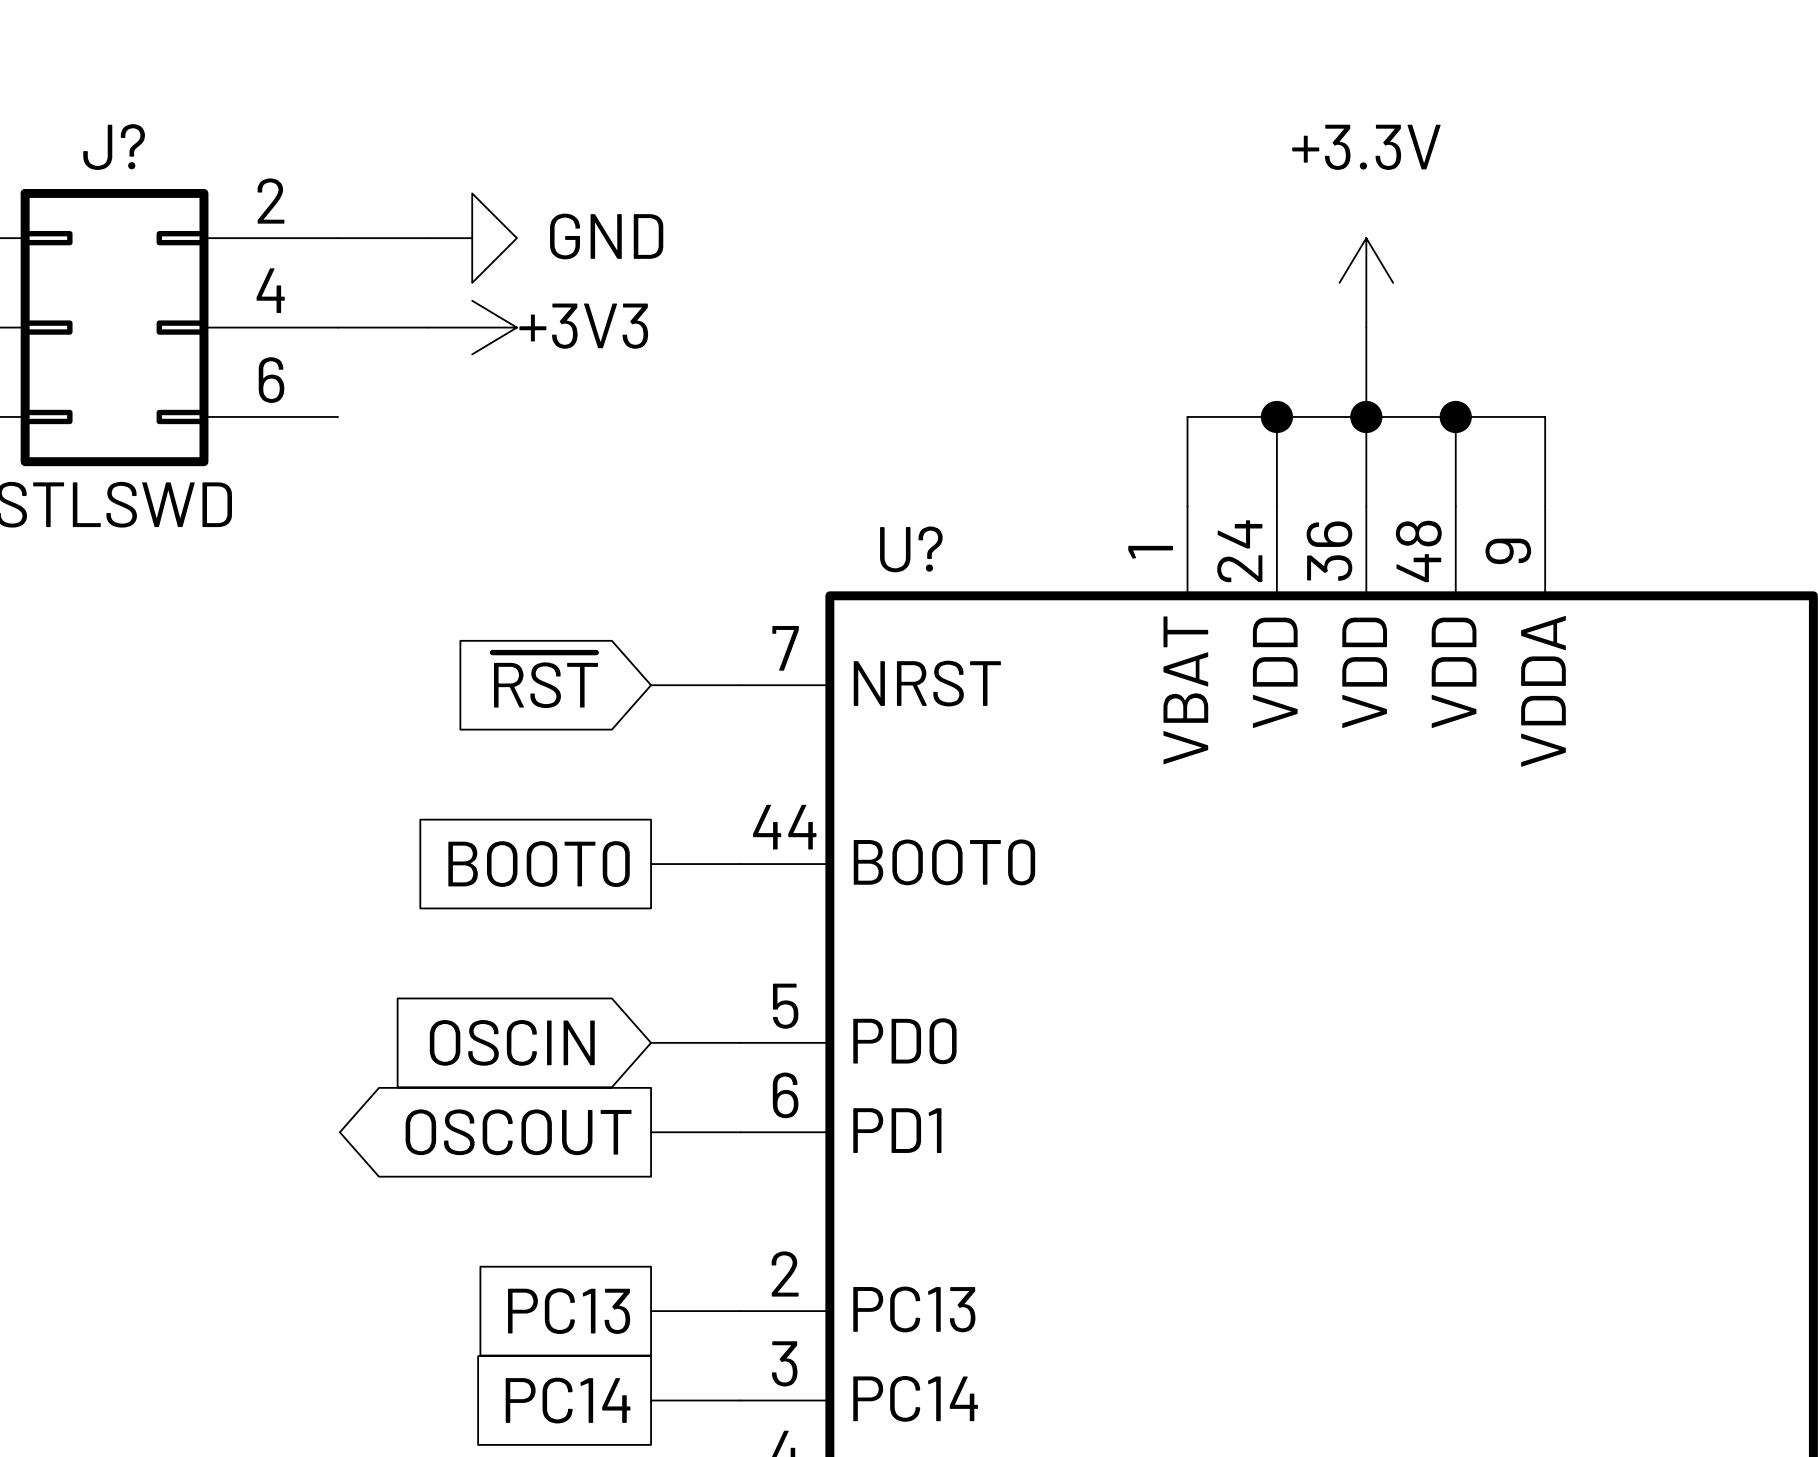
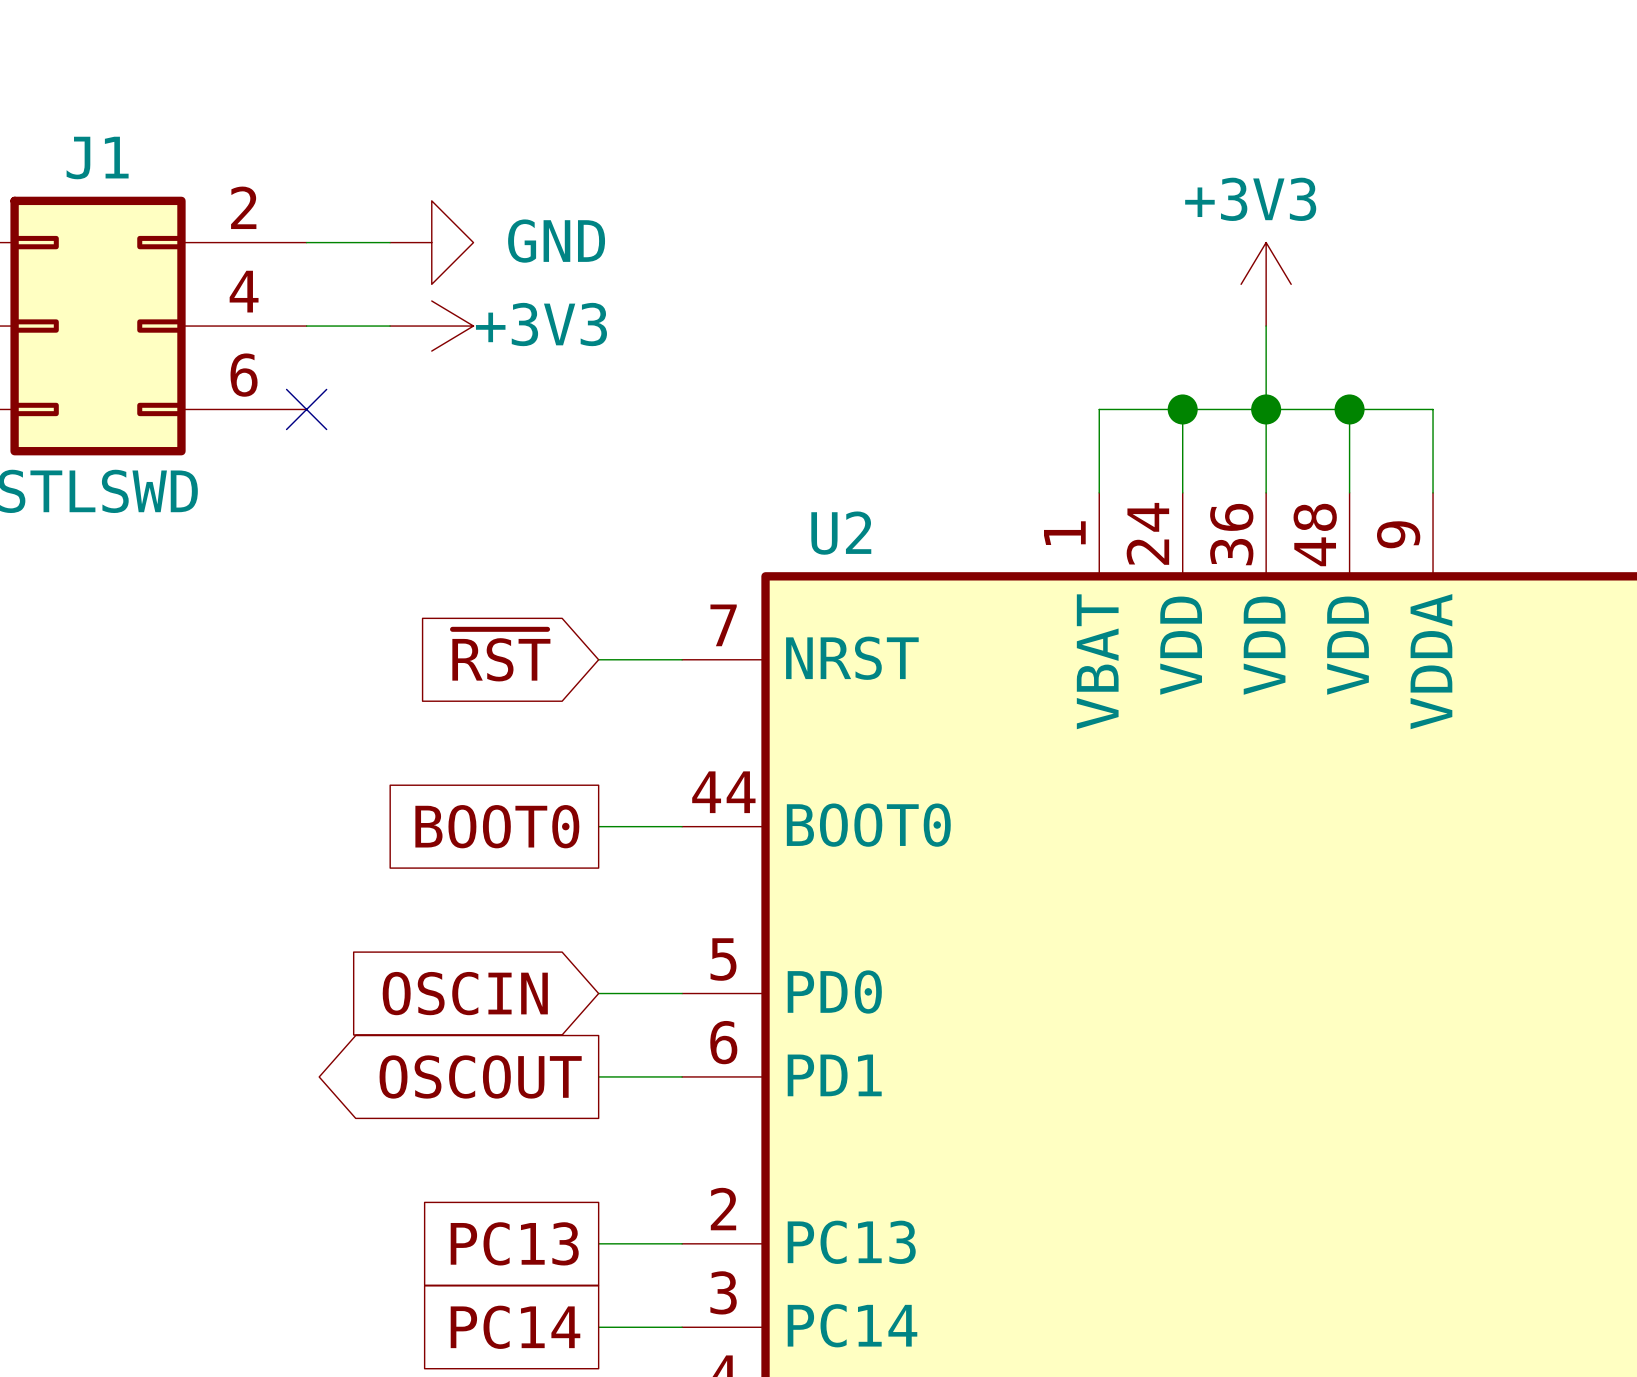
J? name: J? (114, 147) -> J1 (97, 158)
power symbol: +3.3V (1366, 282) -> +3V3 (1266, 284)
no-connect mark: none -> (306, 409)
U? name: U? (911, 549) -> U2 (841, 533)

